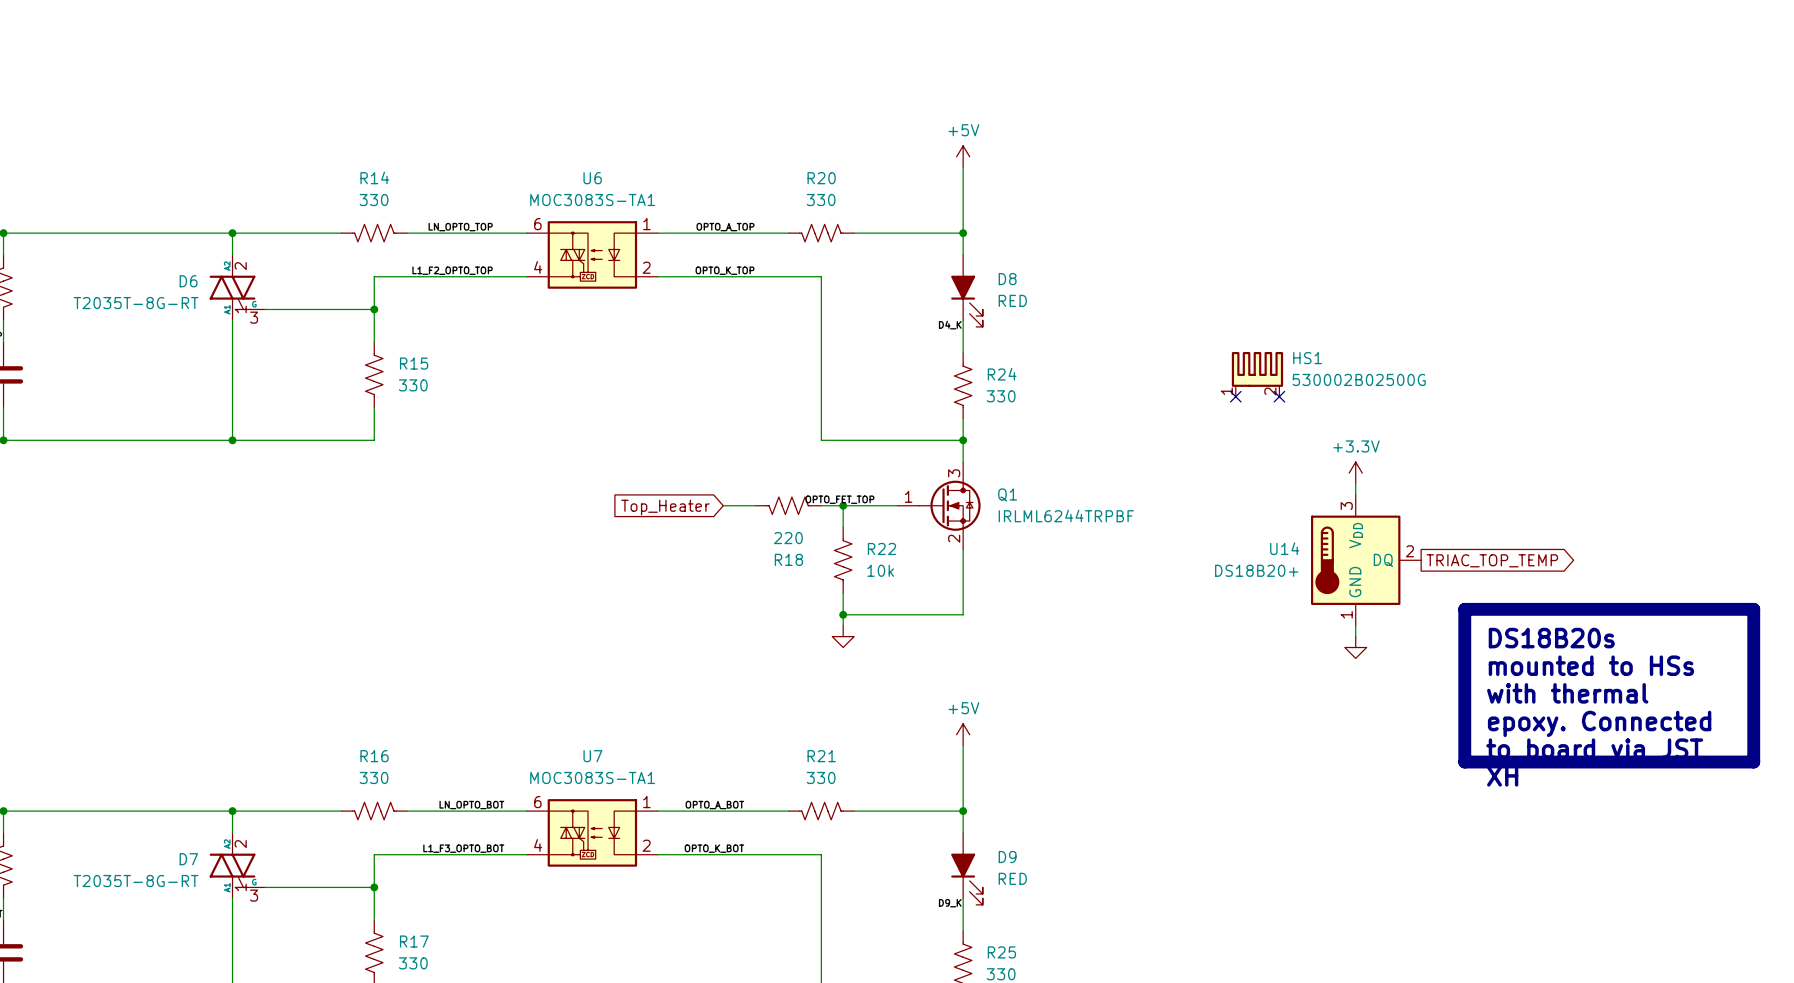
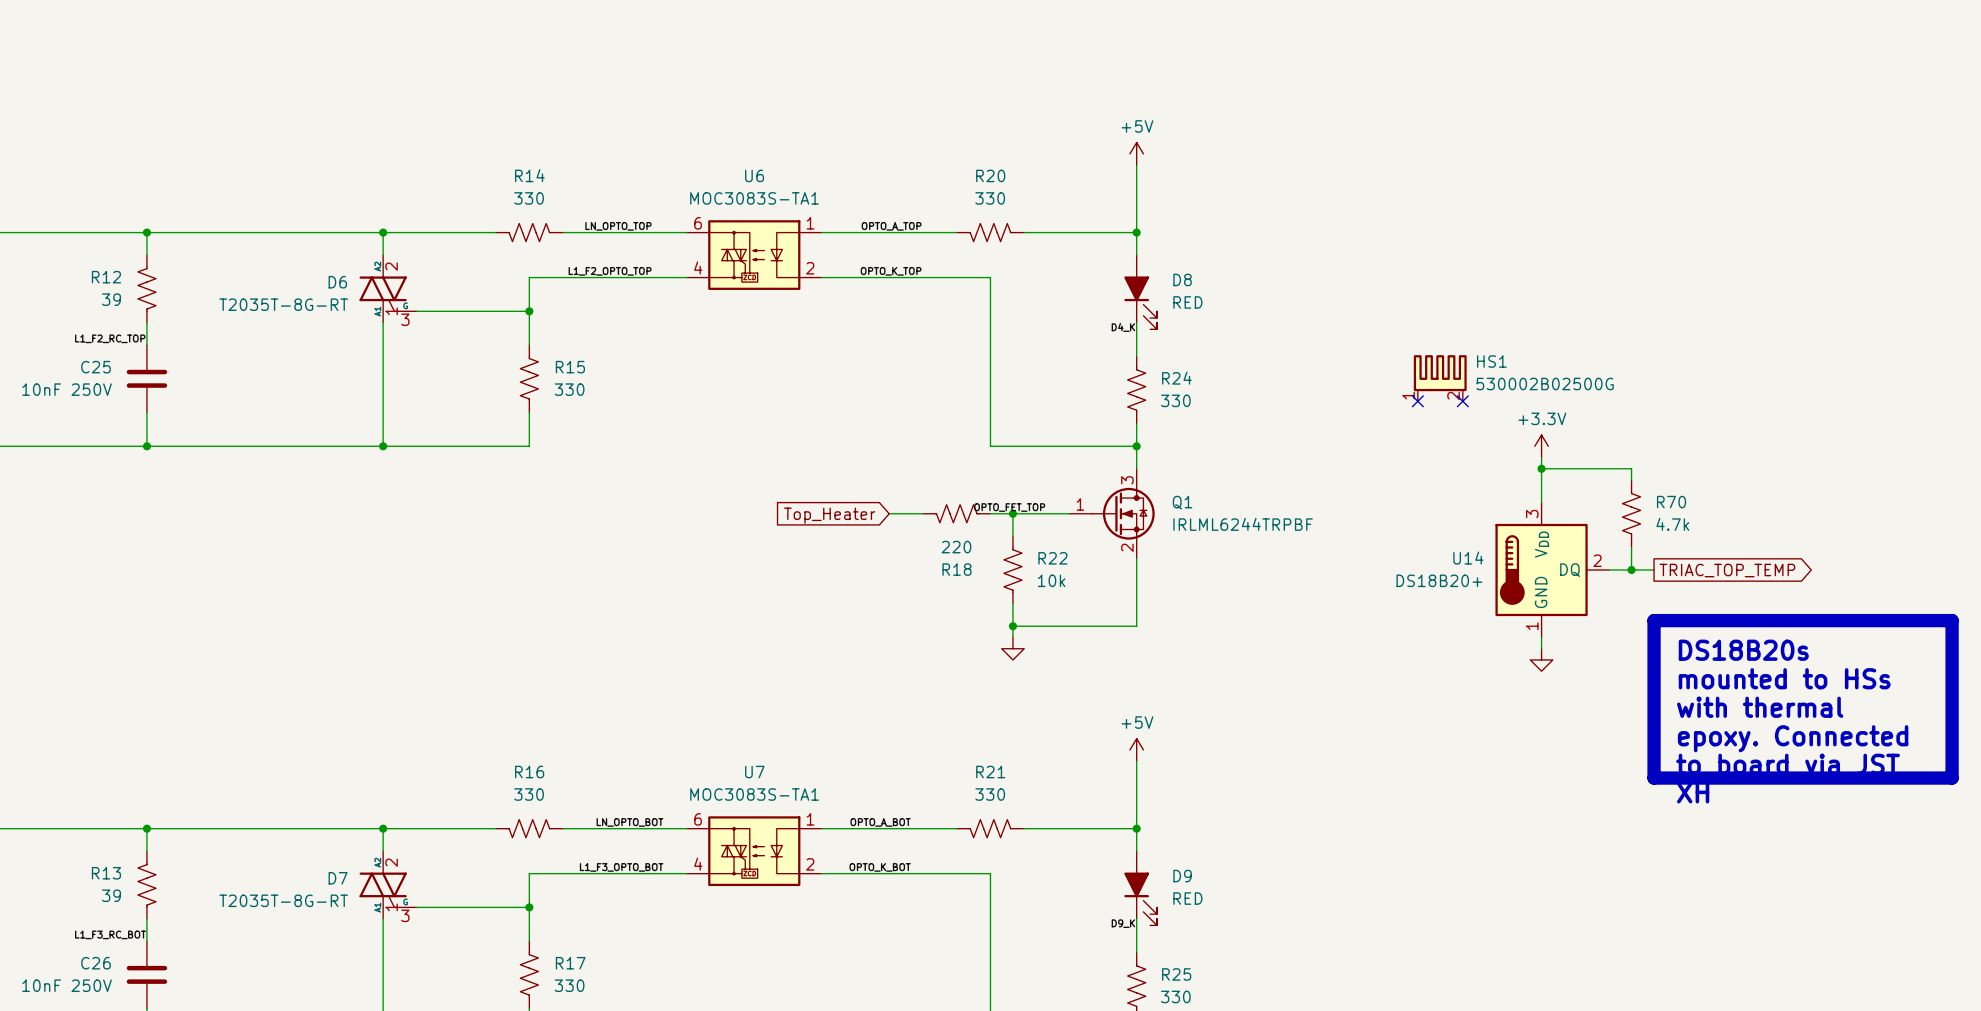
wire: none -> (1541, 468) (1631, 468) (1631, 480)
junction: none -> (1541, 468)
power symbol position: +3.3V (1355, 473) -> +3.3V (1541, 446)
R70: none -> 4.7k (1631, 513)
wire: none -> (1631, 547) (1631, 569)
wire: none -> (1609, 569) (1654, 569)
junction: none -> (1631, 569)
global label position: TRIAC_TOP_TEMP (1492, 560) -> TRIAC_TOP_TEMP (1727, 570)

